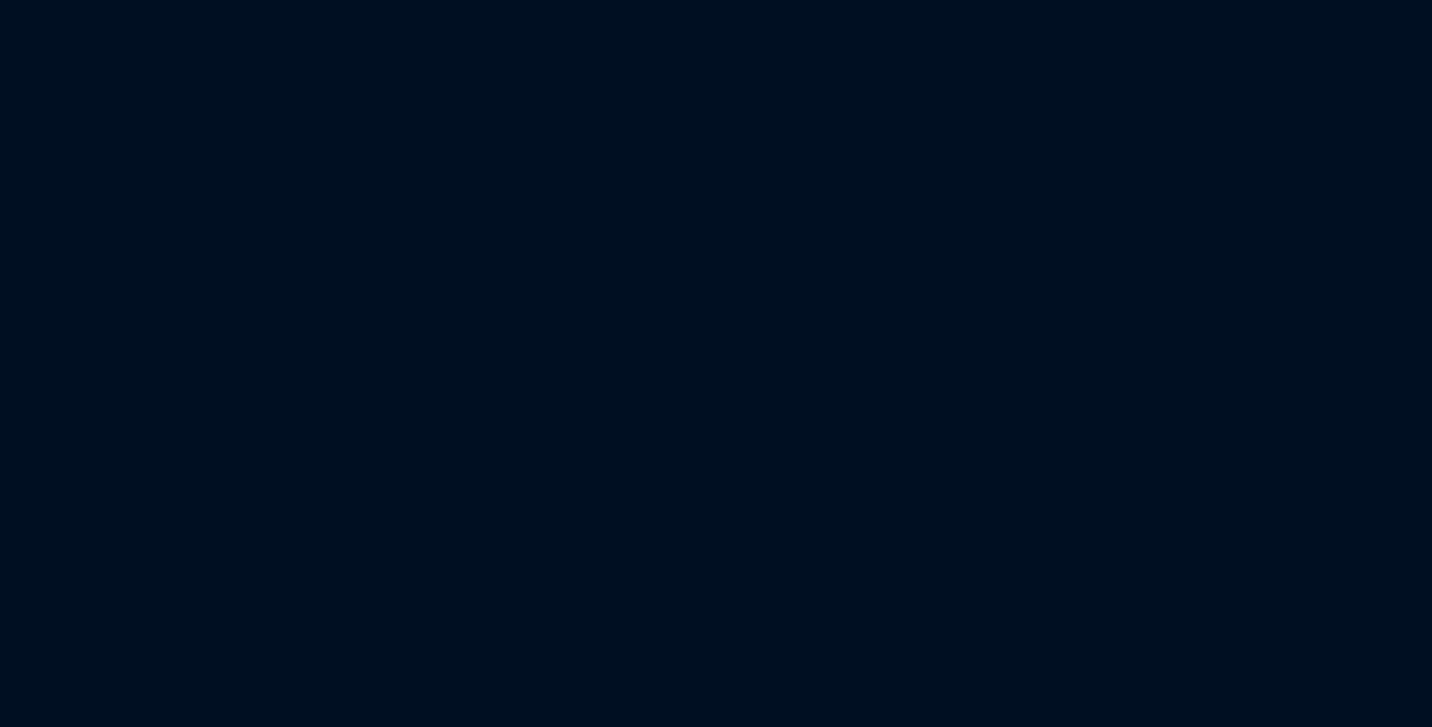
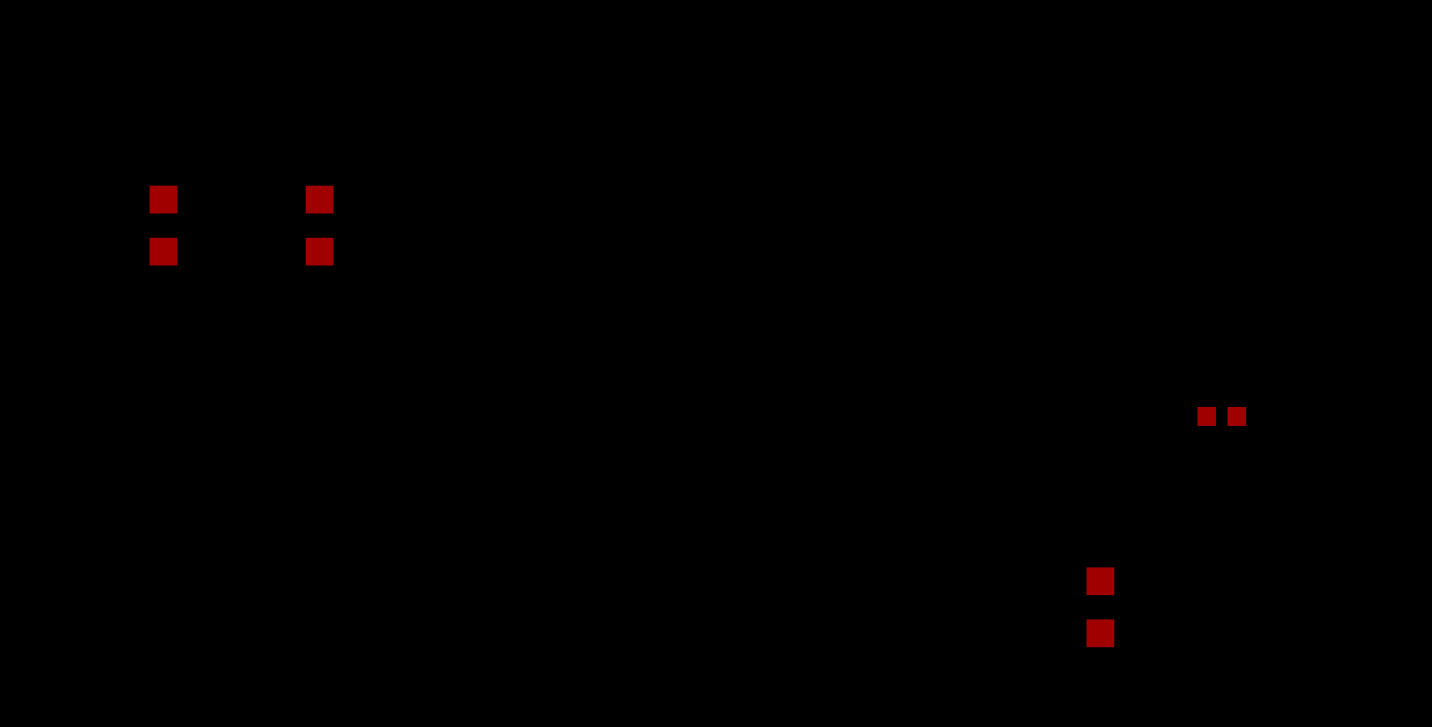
part: none -> (163, 225)
part: none -> (319, 225)
part: none -> (1221, 416)
part: none -> (1100, 607)

